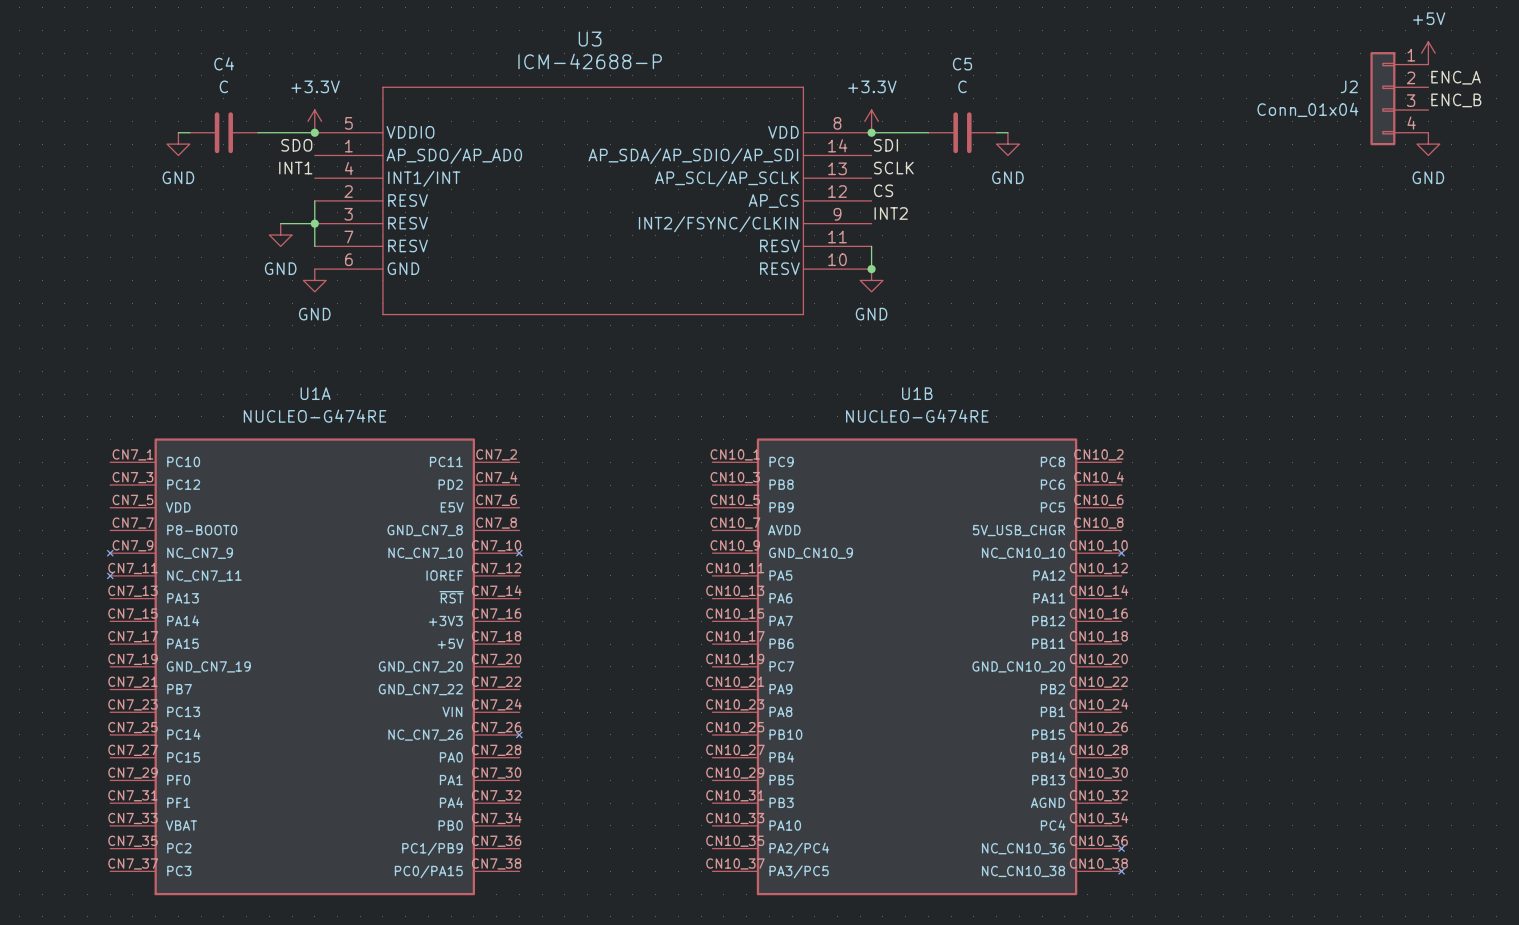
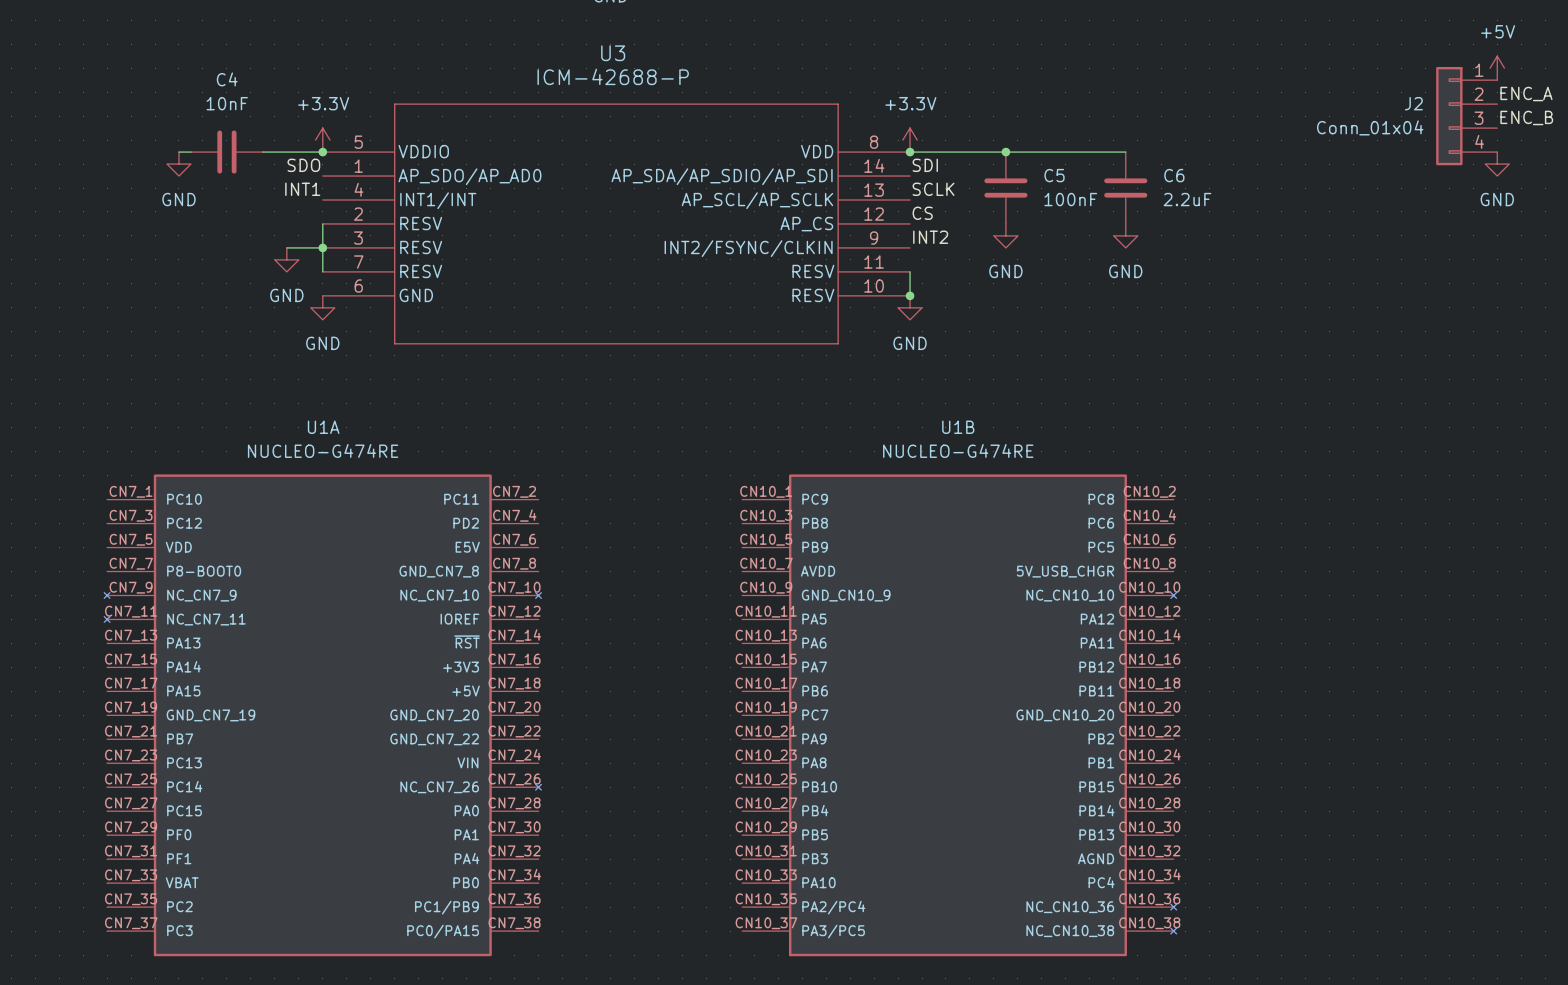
C5 name position: C5 (962, 64) -> C5 (1054, 175)
C4 value: C (223, 86) -> 10nF (227, 103)
C5 value: C (962, 86) -> 100nF (1070, 199)
C5 rotation: 0° (962, 132) -> 90° clockwise (1005, 188)
junction: none -> (1005, 152)
wire: none -> (1053, 152) (1125, 152)
power symbol: GND (1007, 144) -> none
C6: none -> 2.2uF (1125, 188)
power symbol: none -> GND (1005, 235)
power symbol: none -> GND (1125, 235)

